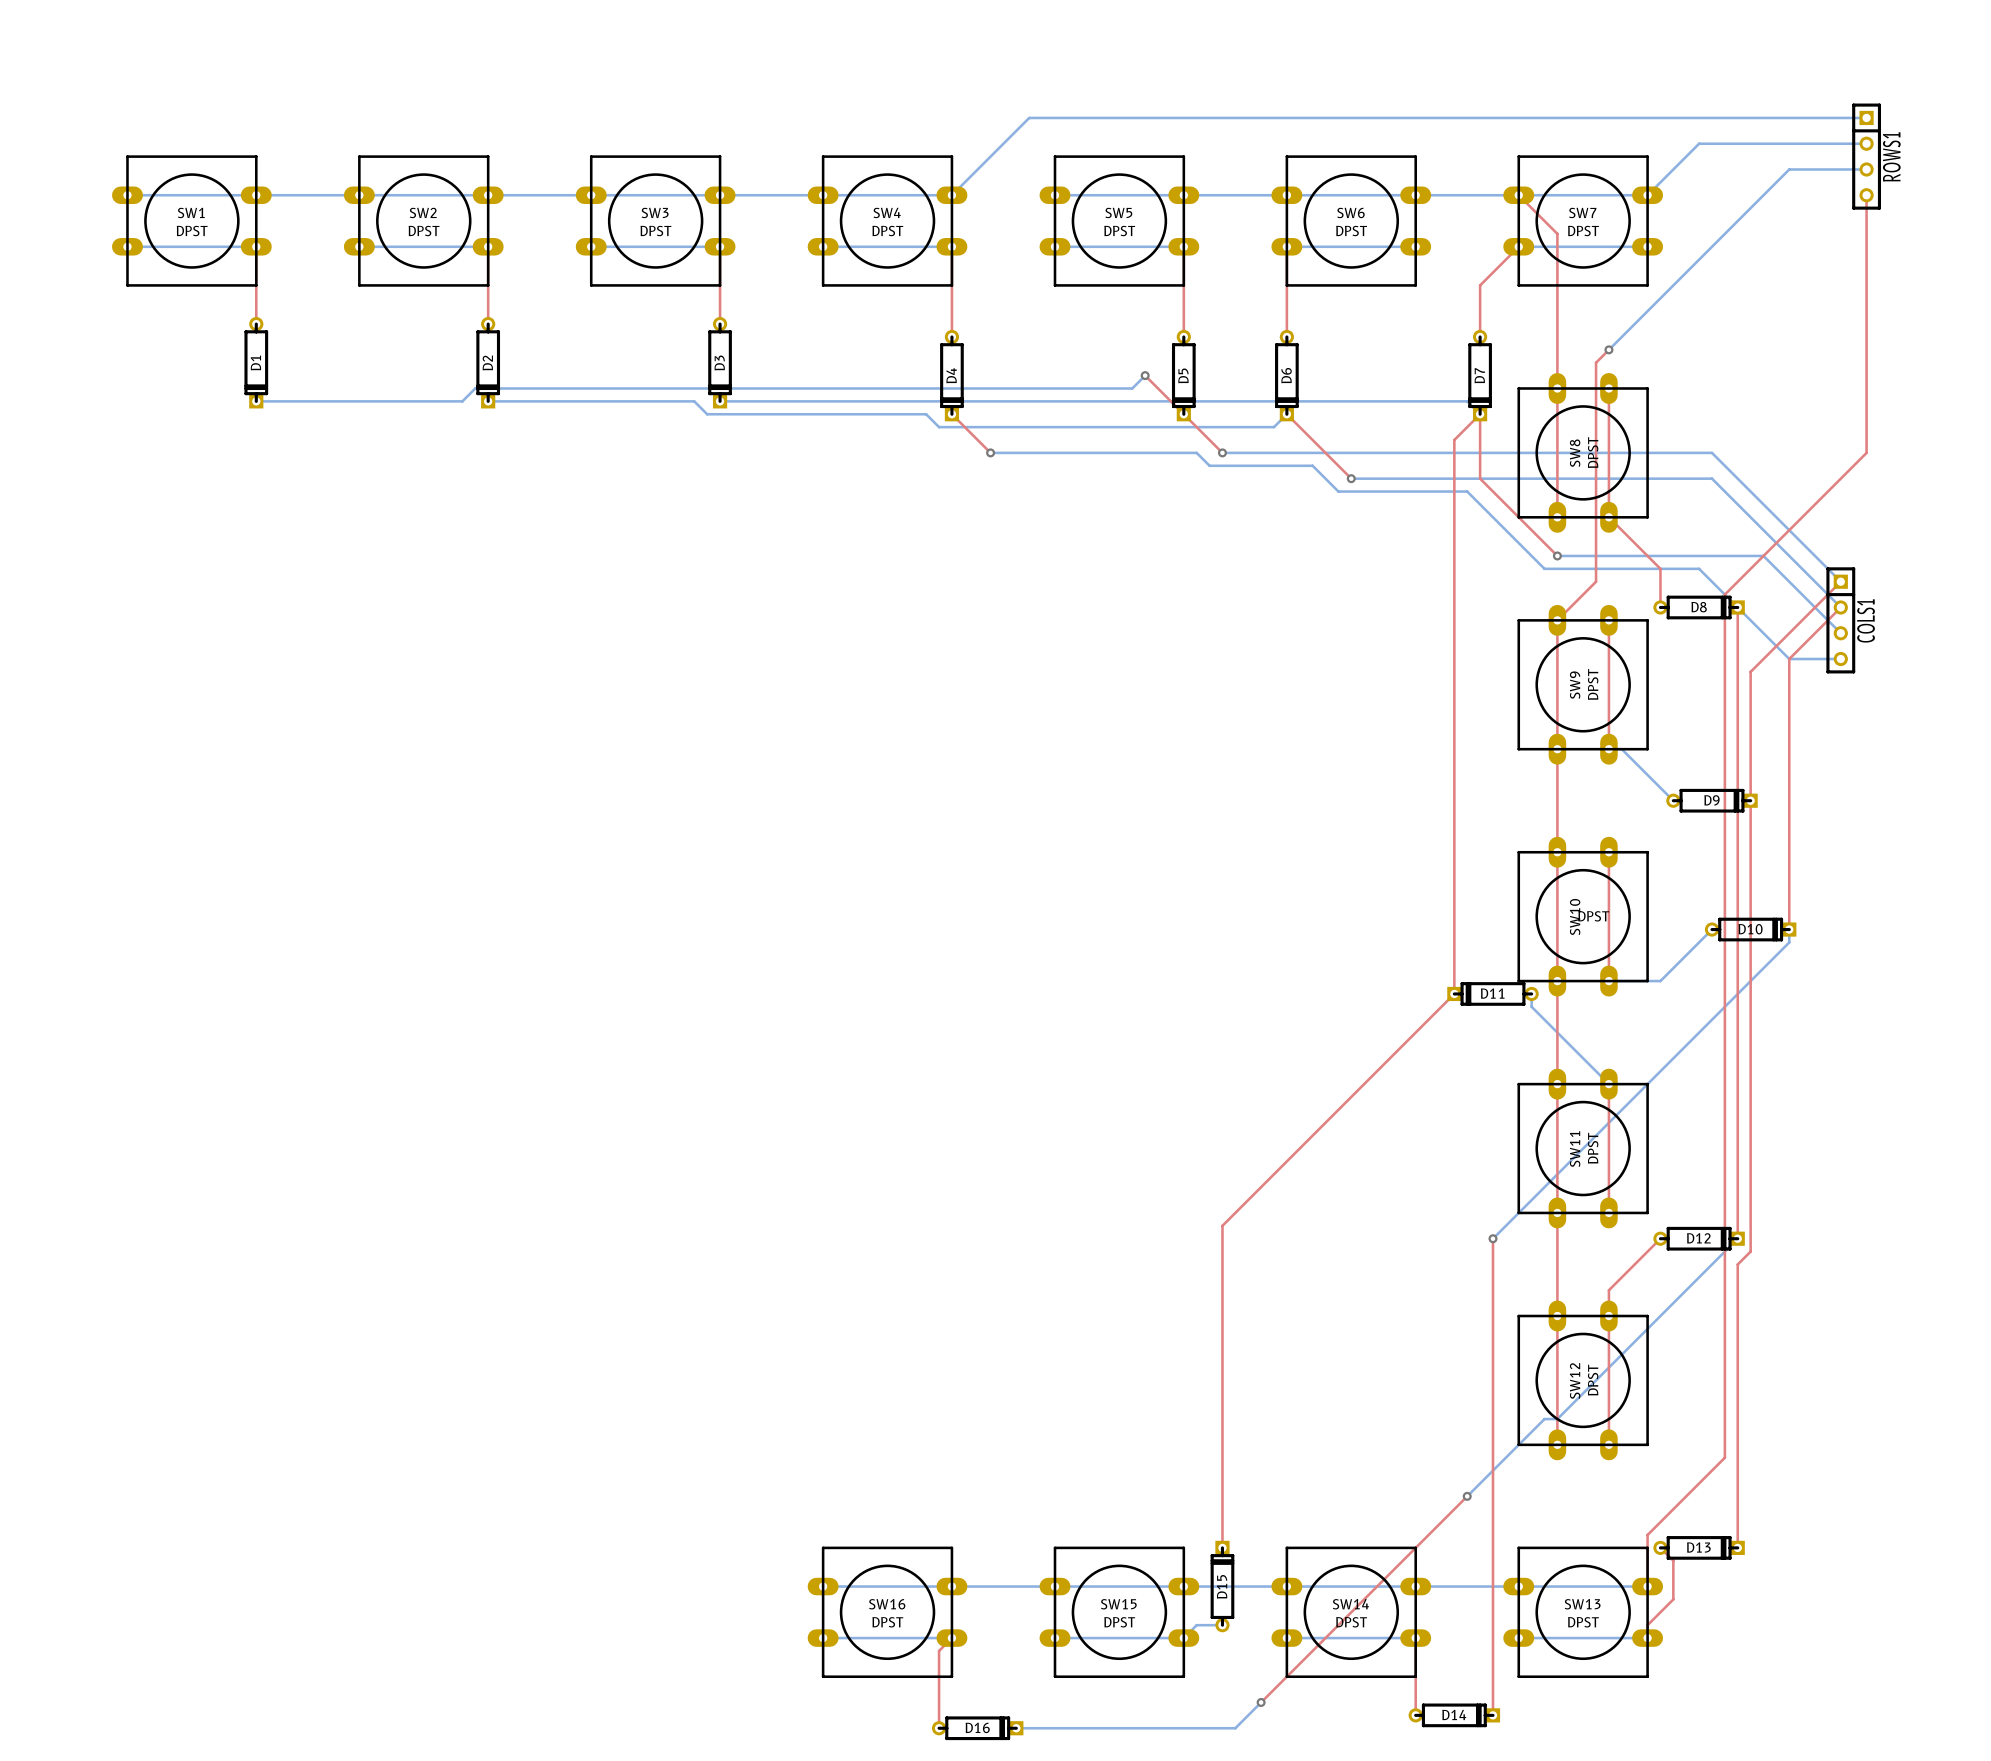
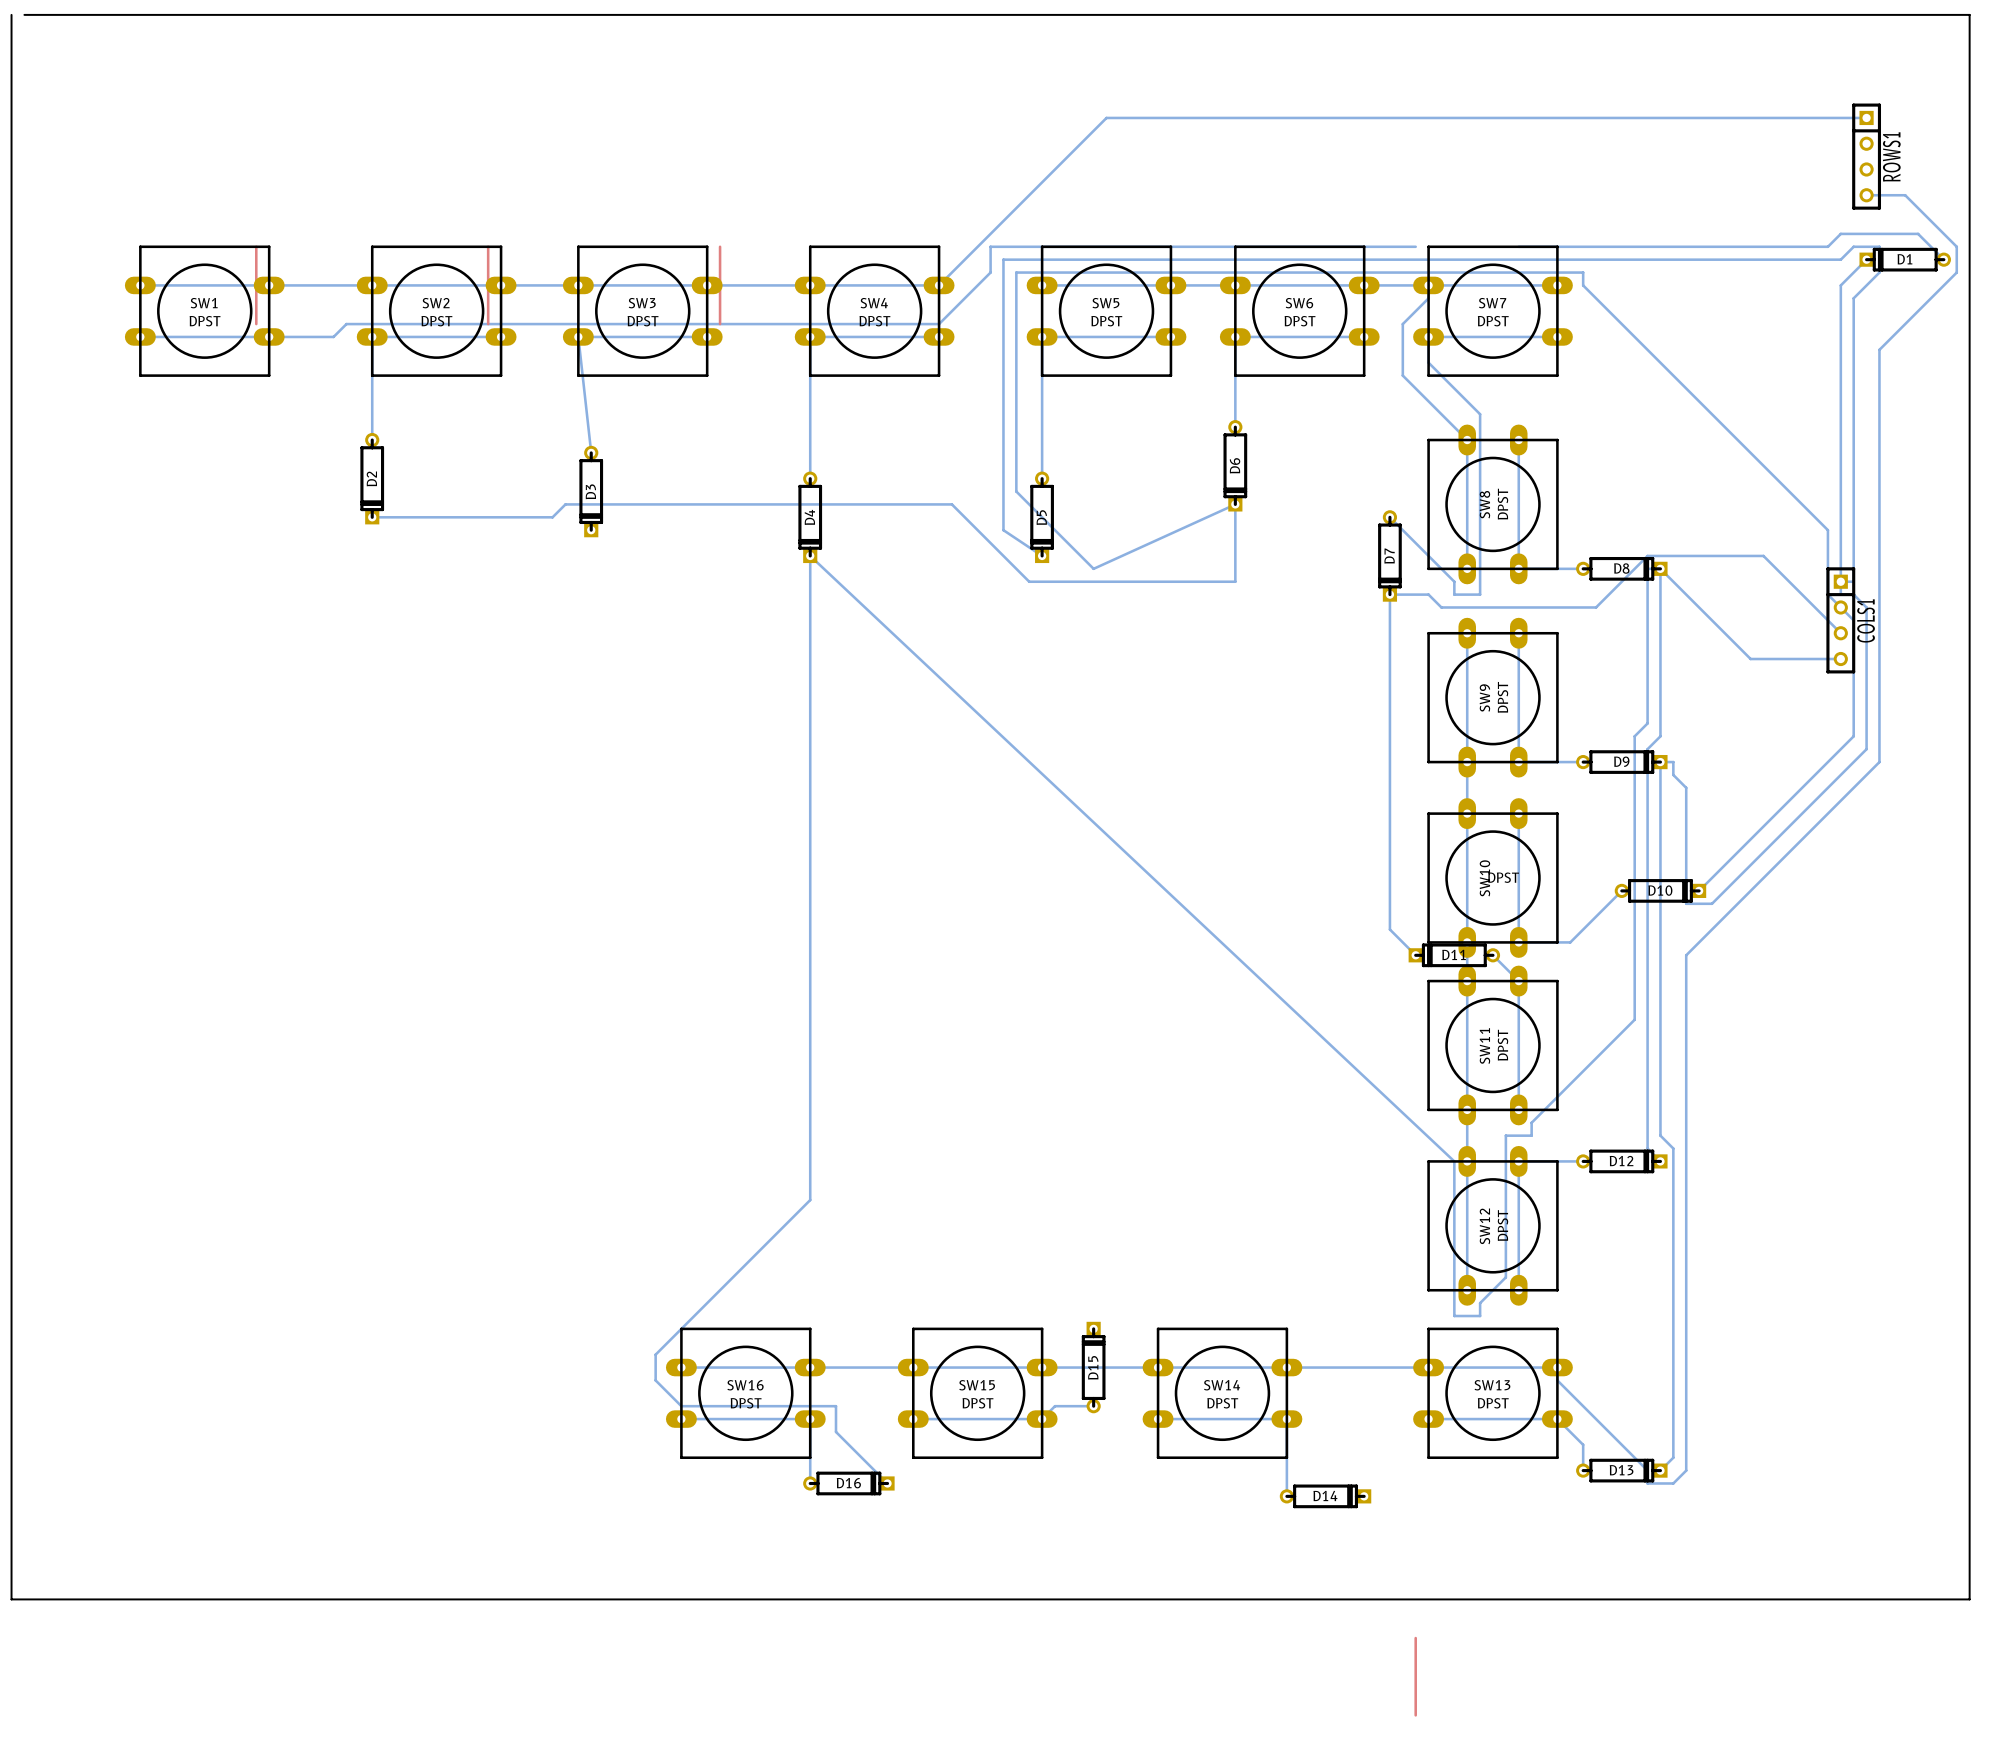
board edge: none -> (11, 14) (11, 1599) (1969, 1599) (1969, 14) (24, 14)
bottom track: (1106, 117) (1029, 117) (951, 195) (127, 195) -> (1106, 117) (939, 285) (140, 285)
bottom track: (1866, 143) (1699, 143) (1647, 195) (1054, 195) -> none
bottom track: (1866, 169) (1789, 169) (1608, 349) -> none
top track: (1518, 195) (1557, 233) (1557, 517) -> none
bottom track: none -> (1866, 195) (1905, 195) (1956, 246) (1956, 272) (1879, 349) (1879, 762) (1711, 929)
top track: (1866, 195) (1866, 452) (1724, 594) (1724, 1457) (1647, 1535) (1647, 1586) -> none
SW1 position: (191, 221) -> (204, 311)
SW2 position: (423, 221) -> (436, 311)
SW3 position: (655, 221) -> (642, 311)
SW4 position: (887, 221) -> (874, 311)
SW5 position: (1119, 221) -> (1106, 311)
SW6 position: (1351, 221) -> (1299, 311)
SW7 position: (1583, 221) -> (1492, 311)
bottom track: (127, 246) (256, 246) -> none
bottom track: (359, 246) (488, 246) -> none
bottom track: (591, 246) (720, 246) -> none
bottom track: (823, 246) (951, 246) -> none
top track: (951, 246) (951, 336) -> none
bottom track: none -> (1054, 246) (990, 246) (990, 272) (939, 324) (346, 324) (333, 336) (140, 336)
bottom track: none -> (1183, 246) (1286, 246)
top track: (1183, 246) (1183, 336) -> none
top track: (1286, 246) (1286, 336) -> none
top track: (1518, 246) (1480, 285) (1480, 336) -> none
bottom track: none -> (1647, 246) (1827, 246) (1840, 233) (1918, 233) (1943, 259)
bottom track: none -> (1866, 259) (1840, 285) (1840, 594) (1853, 594) (1866, 607) (1866, 749) (1711, 903) (1686, 903) (1686, 787) (1673, 774) (1673, 762) (1660, 762) (1660, 1135) (1673, 1148) (1673, 1457) (1660, 1470)
bottom track: none -> (1042, 285) (1557, 285)
bottom track: none -> (1428, 285) (1428, 298) (1402, 324) (1402, 375) (1467, 440) (1467, 568)
bottom track: none -> (501, 336) (372, 336) (372, 440)
bottom track: none -> (707, 336) (578, 336) (591, 452)
bottom track: none -> (939, 336) (810, 336) (810, 478)
bottom track: none -> (1170, 336) (1042, 336) (1042, 478)
bottom track: none -> (1364, 336) (1235, 336) (1235, 427)
top track: (1608, 349) (1596, 362) (1596, 581) (1557, 620) (1557, 1444) -> none
via: (1608, 349) -> none
D1 rotation: 0° (256, 362) -> 90° clockwise (1905, 259)
D1 position: (256, 362) -> (1905, 259)
D2 position: (488, 362) -> (372, 478)
D3 position: (720, 362) -> (591, 491)
D4 position: (951, 375) -> (810, 517)
bottom track: (1145, 375) (1132, 388) (475, 388) (462, 401) (256, 401) -> none
top track: (1145, 375) (1222, 452) -> none
via: (1145, 375) -> none
D5 position: (1183, 375) -> (1042, 517)
D6 position: (1286, 375) -> (1235, 465)
D7 position: (1480, 375) -> (1389, 555)
top track: (1608, 388) (1608, 517) (1660, 568) (1660, 607) -> none
bottom track: (488, 401) (694, 401) (707, 414) (926, 414) (939, 427) (1273, 427) (1286, 414) -> none
bottom track: (720, 401) (1467, 401) -> (1557, 336) (1428, 336) (1428, 362) (1467, 401)
top track: (951, 414) (990, 452) -> none
top track: (1286, 414) (1351, 478) -> none
bottom track: none -> (1480, 414) (1480, 594) (1454, 594) (1454, 581) (1389, 517)
bottom track: (990, 452) (1196, 452) (1209, 465) (1312, 465) (1338, 491) (1467, 491) (1544, 568) -> (1518, 440) (1518, 568) (1544, 568)
via: (990, 452) -> none
bottom track: (1222, 452) (1711, 452) (1840, 581) -> (1042, 555) (1003, 530) (1003, 259) (1840, 259) (1853, 246) (1879, 246) (1879, 272) (1853, 298) (1853, 581) (1840, 581)
via: (1222, 452) -> none
SW8 position: (1583, 452) -> (1492, 504)
bottom track: (1351, 478) (1711, 478) (1827, 594) -> (372, 517) (552, 517) (565, 504) (951, 504) (1029, 581) (1235, 581) (1235, 504) (1093, 568) (1016, 491) (1016, 272) (1583, 272) (1583, 285) (1827, 530) (1827, 594)
via: (1351, 478) -> none
bottom track: (1557, 555) (1647, 555) -> (1415, 955) (1389, 929) (1389, 594) (1428, 594) (1441, 607) (1596, 607) (1647, 555)
top track: (1557, 555) (1480, 478) (1480, 414) (1454, 440) (1454, 993) (1222, 1225) (1222, 1547) -> none
via: (1557, 555) -> none
bottom track: (1583, 568) (1647, 568) -> (887, 1483) (836, 1431) (836, 1406) (681, 1406) (655, 1380) (655, 1354) (810, 1200) (810, 555) (1454, 1161) (1454, 1316) (1480, 1316) (1480, 1303) (1505, 1277) (1505, 1135) (1531, 1135) (1531, 1122) (1634, 1019) (1634, 736) (1647, 723) (1647, 568)
bottom track: (1660, 568) (1699, 568) (1789, 659) -> (1660, 1161) (1647, 1148) (1647, 749) (1660, 736) (1660, 568) (1750, 659) (1789, 659)
top track: (1840, 581) (1750, 671) (1750, 1251) (1737, 1264) (1737, 1547) -> none
D8 position: (1699, 607) -> (1621, 568)
top track: (1737, 607) (1737, 1238) -> none
bottom track: none -> (1840, 607) (1853, 620) (1853, 736) (1699, 890)
top track: (1840, 607) (1789, 659) (1789, 929) -> none
top track: (1608, 620) (1608, 749) -> none
bottom track: none -> (1467, 633) (1467, 1290)
bottom track: none -> (1518, 633) (1518, 762) (1583, 762)
SW9 position: (1583, 684) -> (1492, 697)
bottom track: (1608, 749) (1621, 749) (1673, 800) -> none
D9 position: (1711, 800) -> (1621, 762)
bottom track: none -> (1518, 813) (1518, 942) (1570, 942) (1621, 890)
top track: (1608, 852) (1608, 981) -> none
SW10 position: (1583, 916) -> (1492, 878)
D10 position: (1750, 929) -> (1660, 890)
bottom track: (1789, 929) (1789, 942) (1492, 1238) -> none
bottom track: none -> (1492, 955) (1518, 981) (1518, 1109)
bottom track: (1686, 955) (1660, 981) (1608, 981) -> (1686, 955) (1686, 1470) (1673, 1483) (1647, 1483) (1647, 1470) (1557, 1380) (1557, 1367) (681, 1367)
D11 position: (1492, 993) -> (1454, 955)
bottom track: (1531, 993) (1531, 1006) (1608, 1084) -> none
top track: (1608, 1084) (1608, 1212) -> none
SW11 position: (1583, 1148) -> (1492, 1045)
bottom track: none -> (1583, 1161) (1518, 1161) (1518, 1290)
top track: (1492, 1238) (1492, 1715) -> none
via: (1492, 1238) -> none
top track: (1660, 1238) (1608, 1290) (1608, 1444) -> none
D12 position: (1699, 1238) -> (1621, 1161)
bottom track: (1737, 1238) (1557, 1419) -> (1583, 1470) (1583, 1444) (1557, 1419)
SW12 position: (1583, 1380) -> (1492, 1225)
bottom track: none -> (1093, 1406) (1054, 1406) (1042, 1419) (913, 1419)
bottom track: none -> (681, 1419) (810, 1419) (810, 1483)
bottom track: none -> (1158, 1419) (1286, 1419) (1286, 1496)
bottom track: (1544, 1419) (1467, 1496) -> (1544, 1419) (1428, 1419)
top track: (1467, 1496) (1261, 1702) -> none
via: (1467, 1496) -> none
top track: (1660, 1547) (1673, 1560) (1673, 1599) (1647, 1625) (1647, 1638) -> none
D13 position: (1699, 1547) -> (1621, 1470)
bottom track: (823, 1586) (1647, 1586) -> none
D15 position: (1222, 1586) -> (1093, 1367)
SW16 position: (887, 1612) -> (745, 1393)
SW15 position: (1119, 1612) -> (977, 1393)
SW14 position: (1351, 1612) -> (1222, 1393)
SW13 position: (1583, 1612) -> (1492, 1393)
bottom track: (1222, 1625) (1196, 1625) (1183, 1638) (1054, 1638) -> none
bottom track: (823, 1638) (951, 1638) -> none
top track: (951, 1638) (939, 1650) (939, 1728) -> none
bottom track: (1286, 1638) (1415, 1638) -> none
bottom track: (1518, 1638) (1647, 1638) -> none
bottom track: (1261, 1702) (1235, 1728) (1016, 1728) -> none
via: (1261, 1702) -> none
D14 position: (1454, 1715) -> (1325, 1496)
D16 position: (977, 1728) -> (848, 1483)

